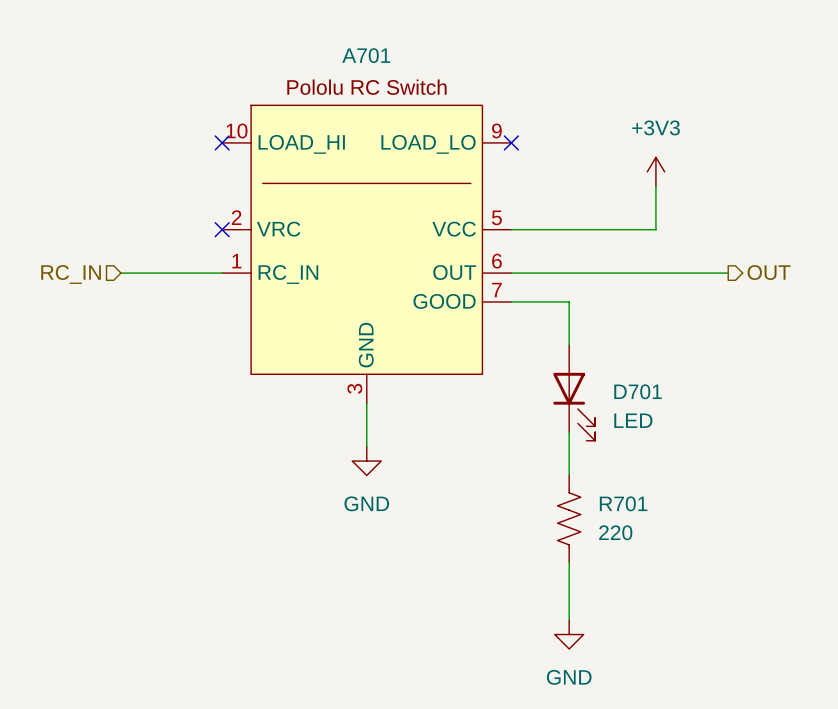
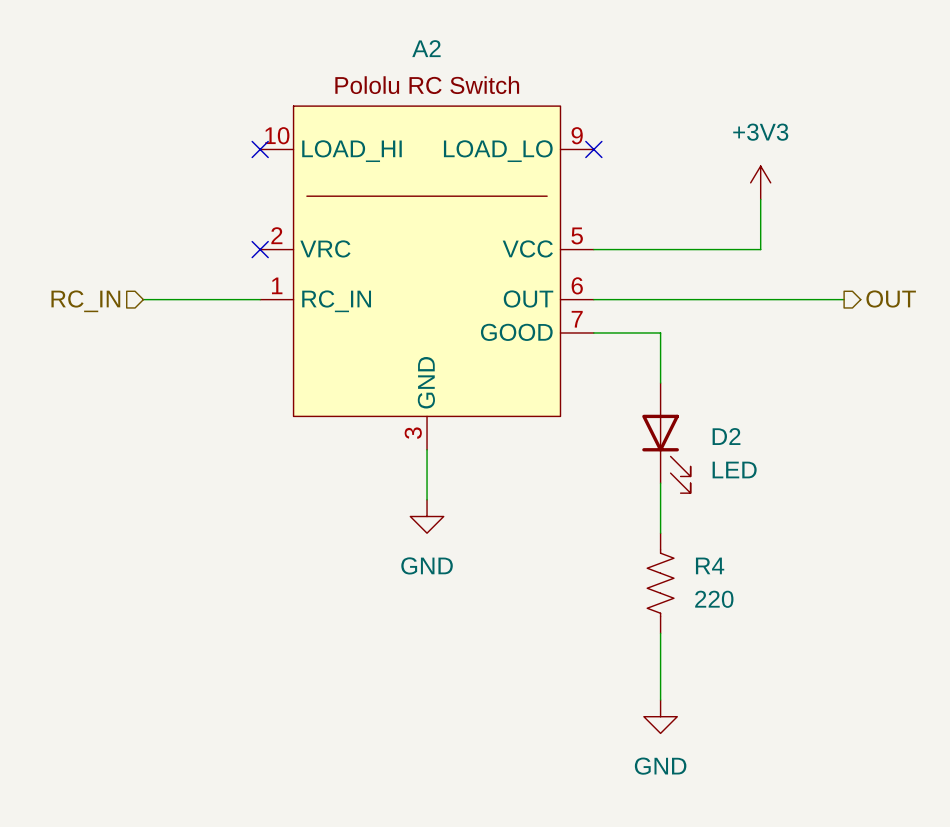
A701 name: A701 (366, 55) -> A2 (426, 48)
D701 name: D701 (638, 391) -> D2 (726, 436)
R701 name: R701 (623, 503) -> R4 (710, 565)

